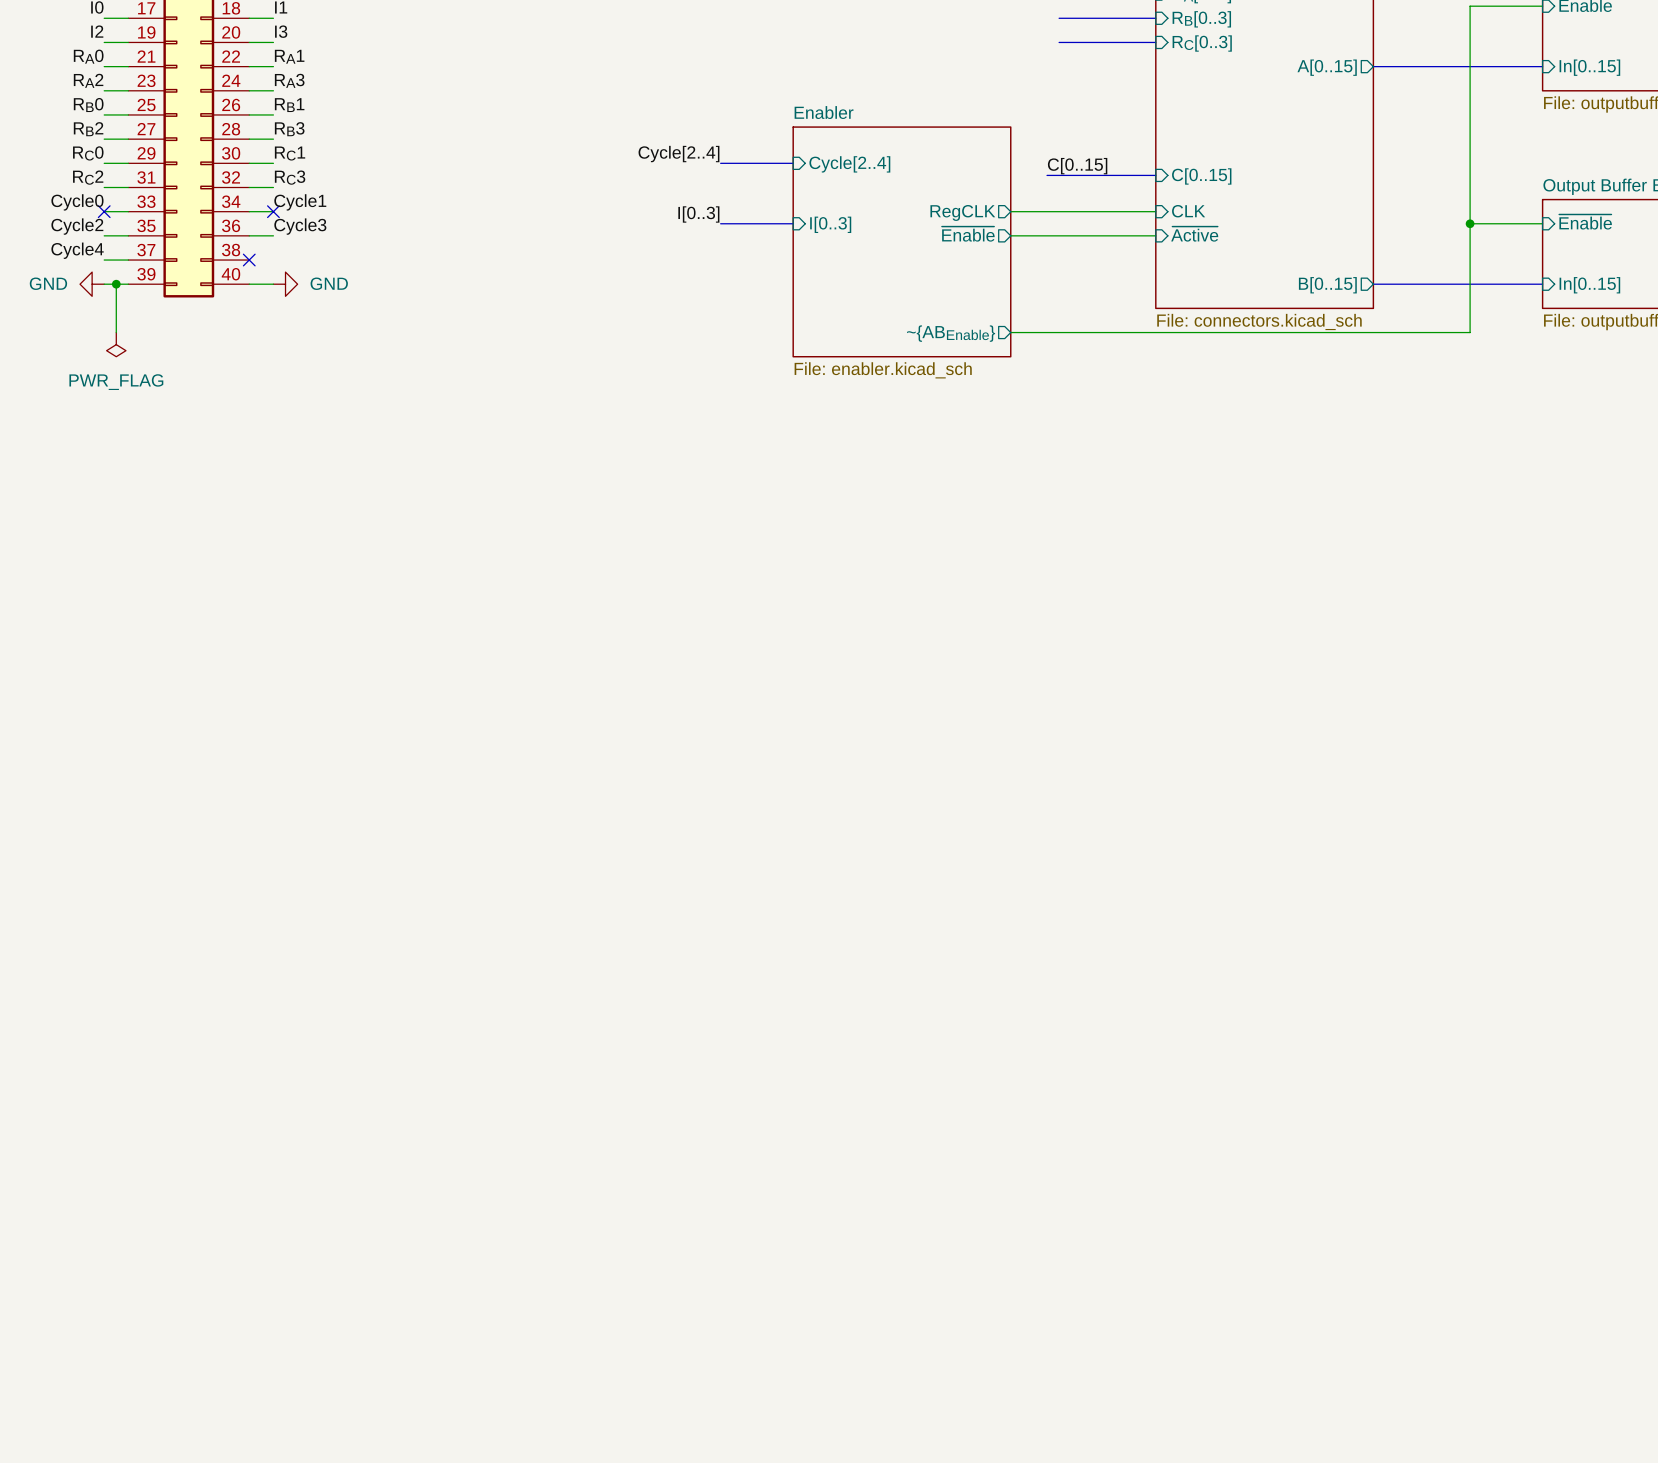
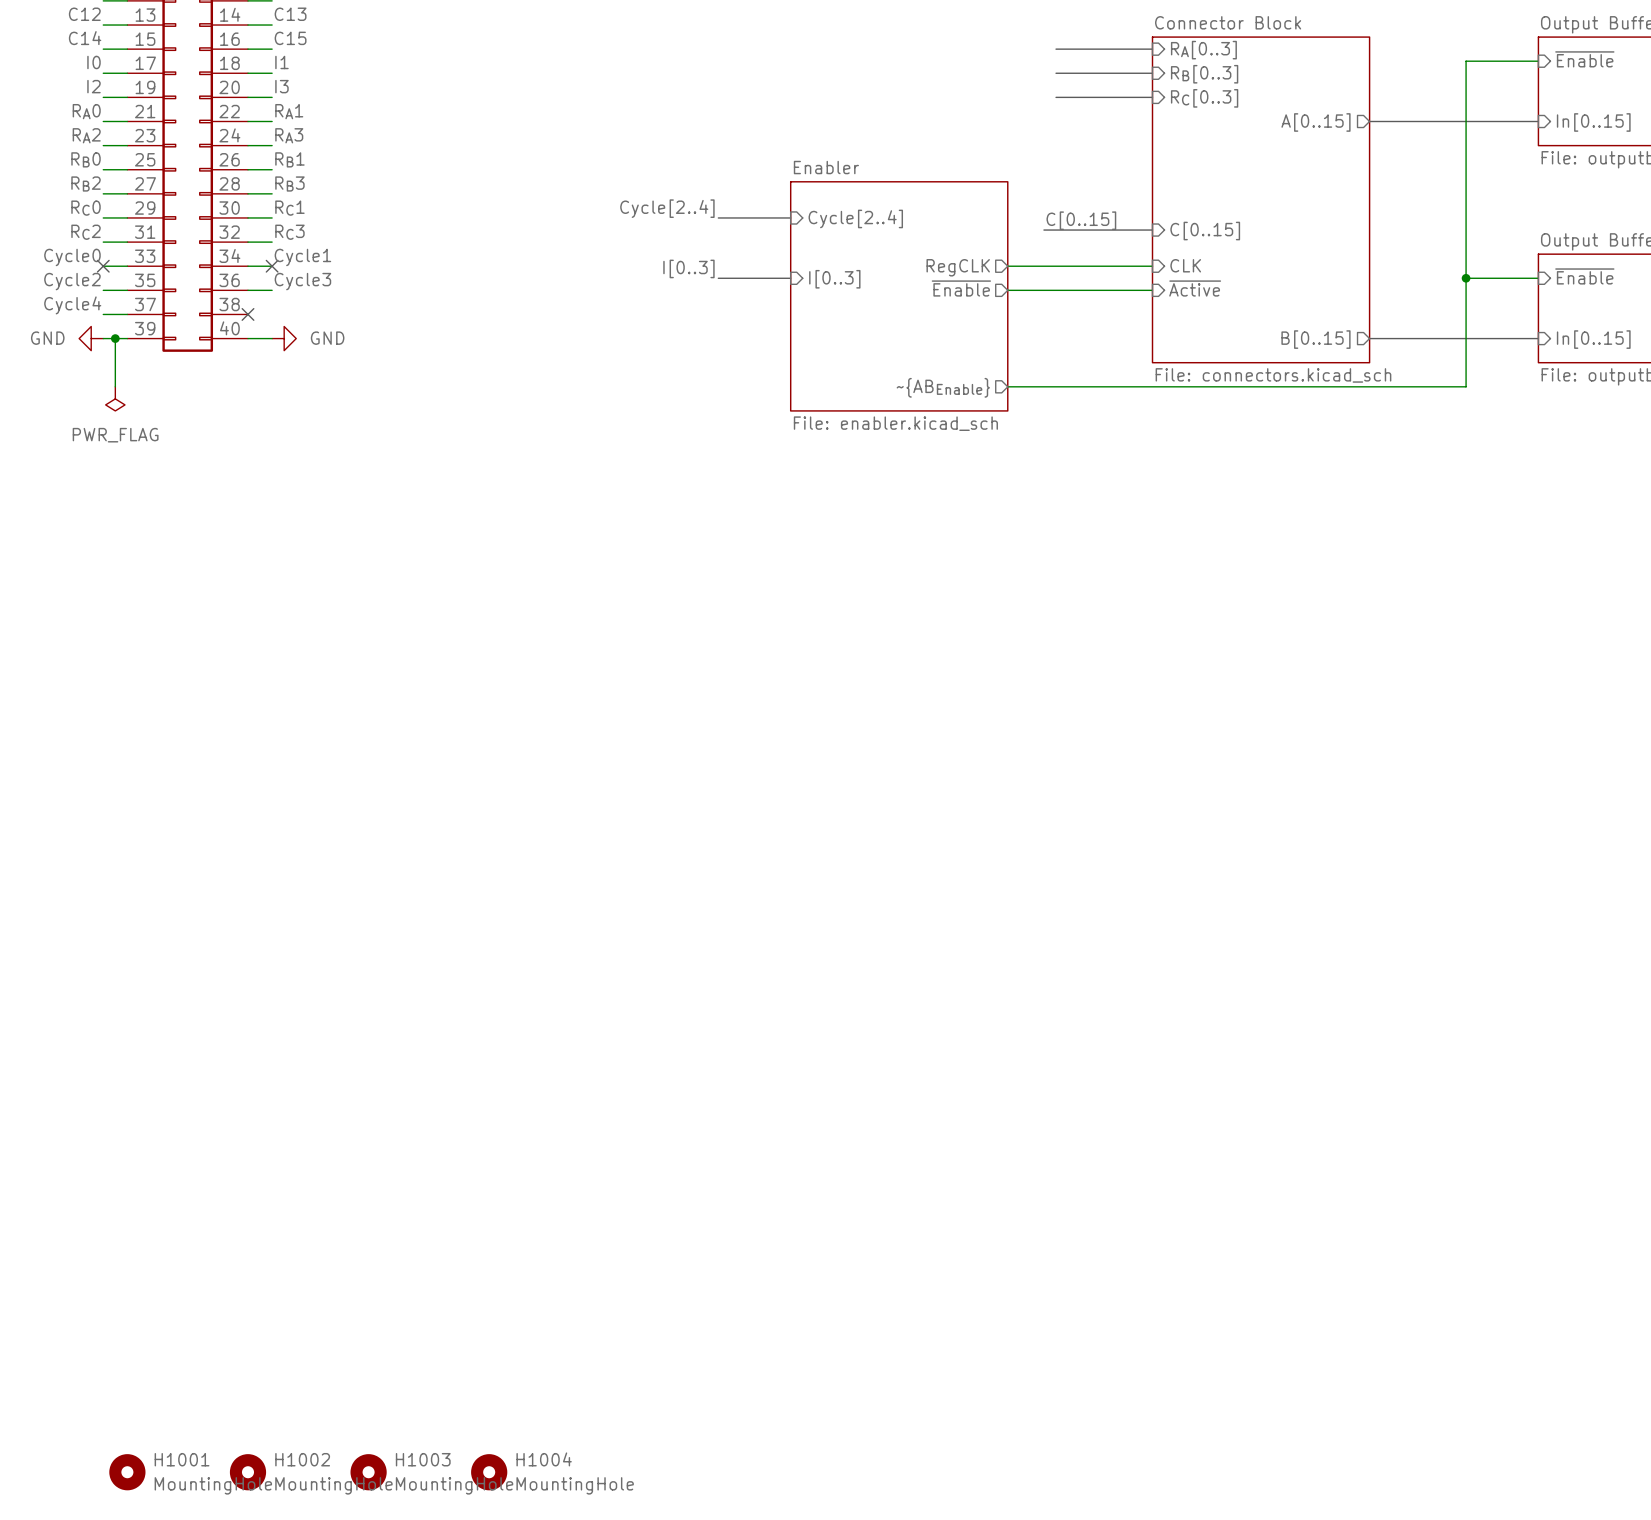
H1001: none -> MountingHole (127, 1472)
H1002: none -> MountingHole (247, 1472)
H1003: none -> MountingHole (368, 1472)
H1004: none -> MountingHole (489, 1472)

